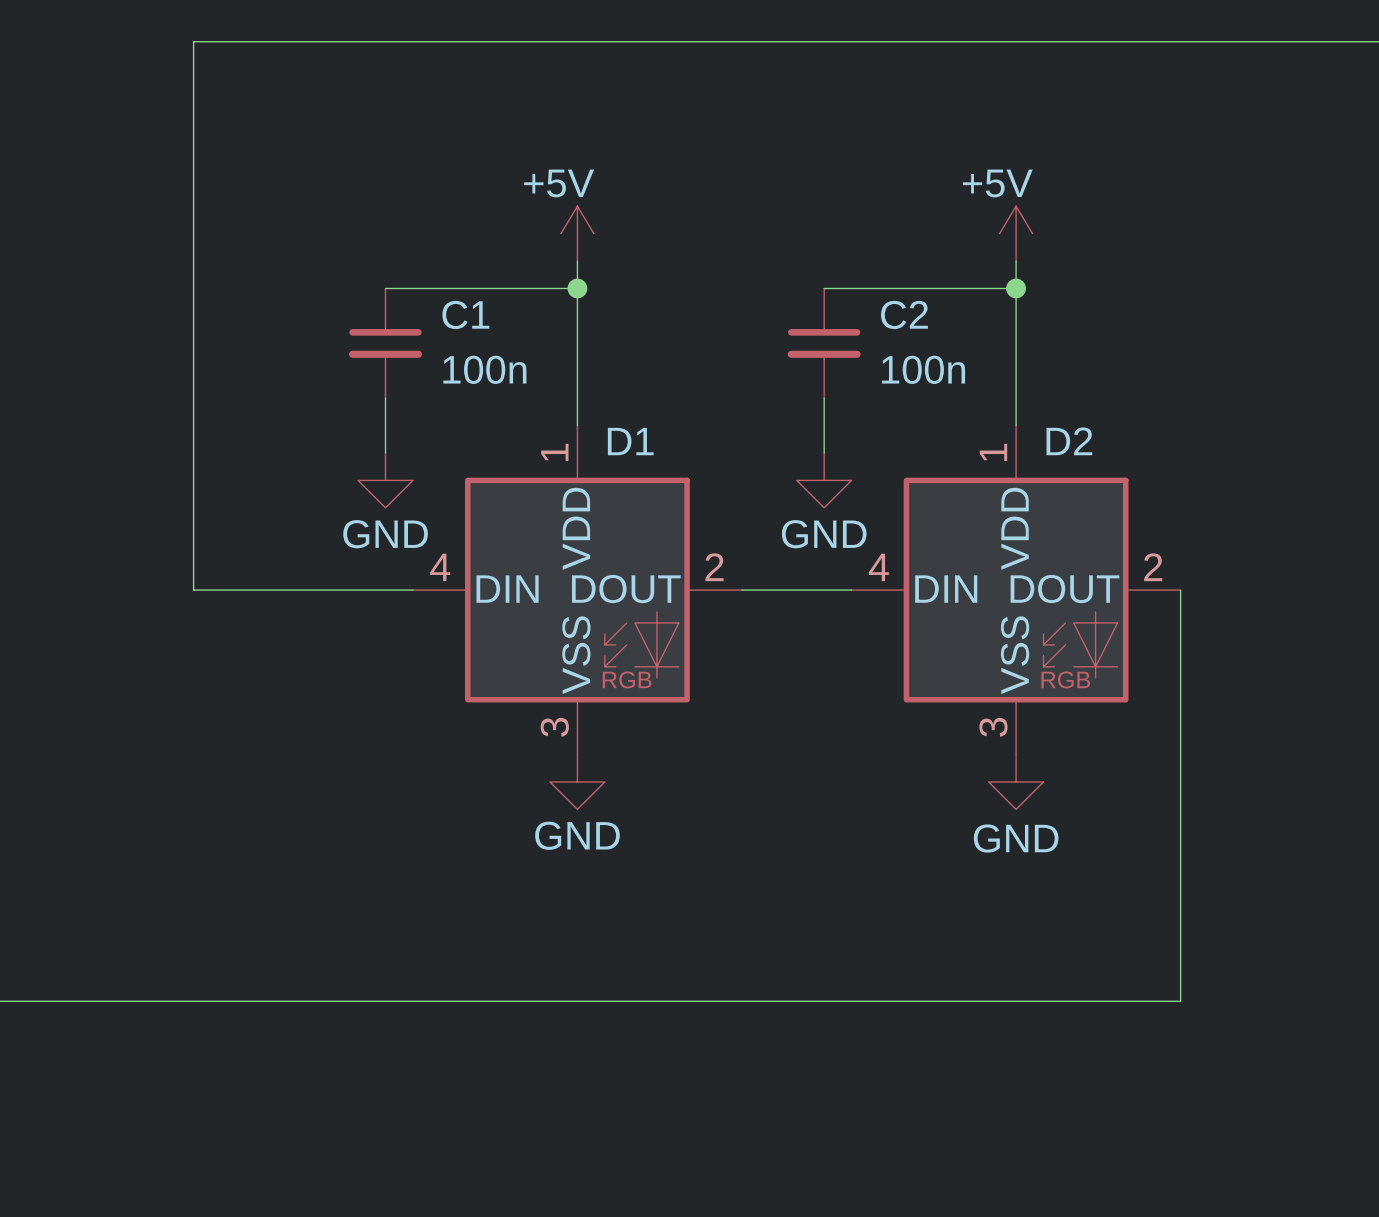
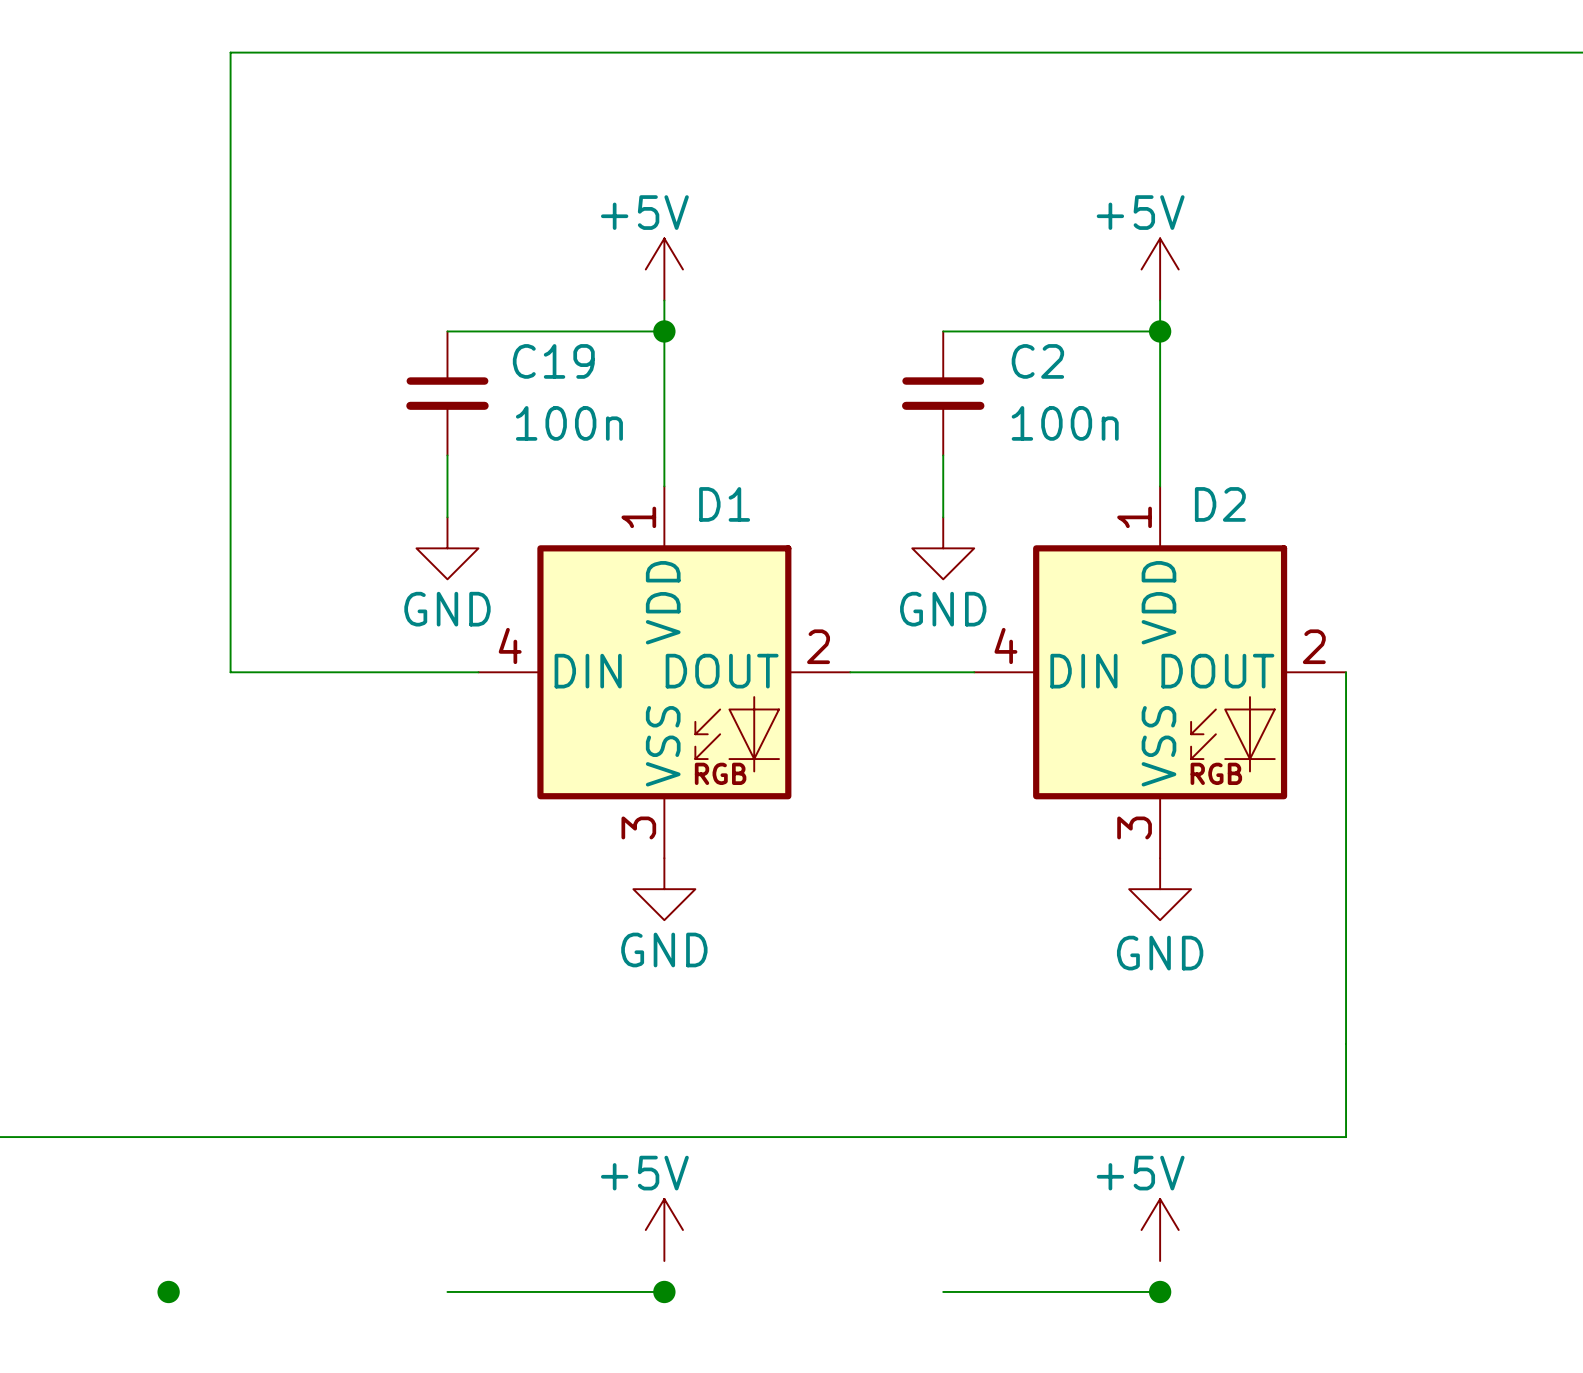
C1 name: C1 (465, 315) -> C19 (553, 361)
power symbol: none -> +5V (664, 1230)
power symbol: none -> +5V (1160, 1230)
junction: none -> (168, 1291)
wire: none -> (447, 1291) (664, 1291)
junction: none -> (664, 1291)
wire: none -> (943, 1291) (1160, 1291)
junction: none -> (1160, 1291)

